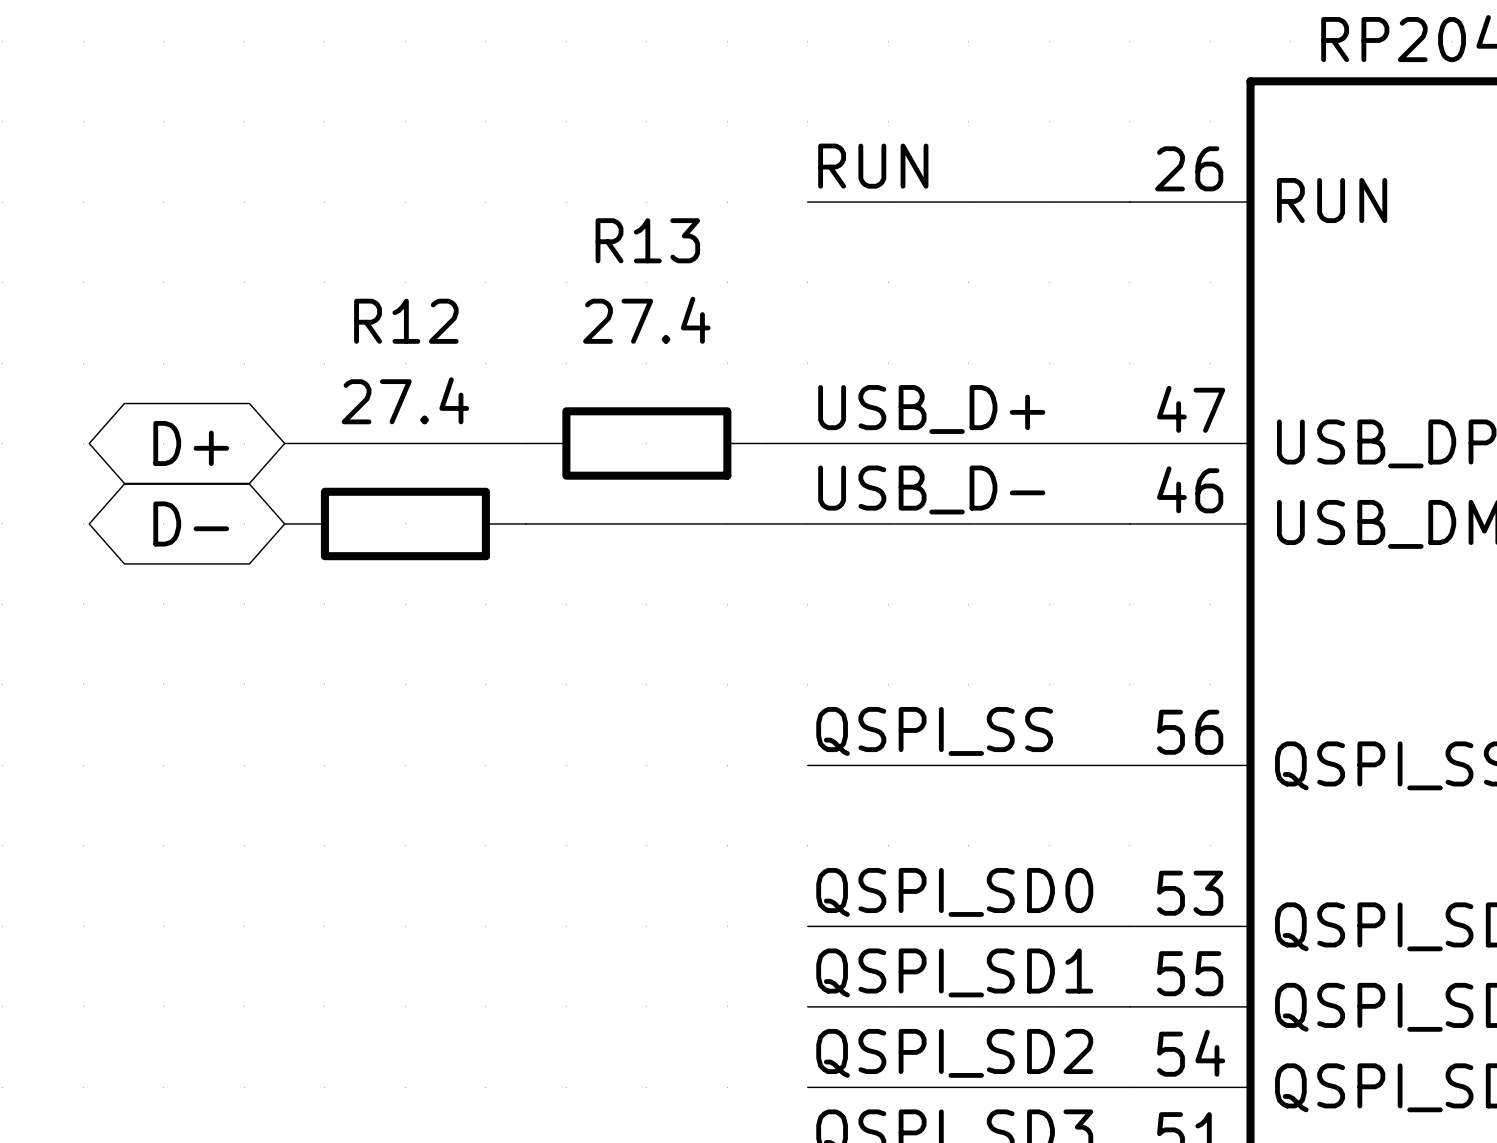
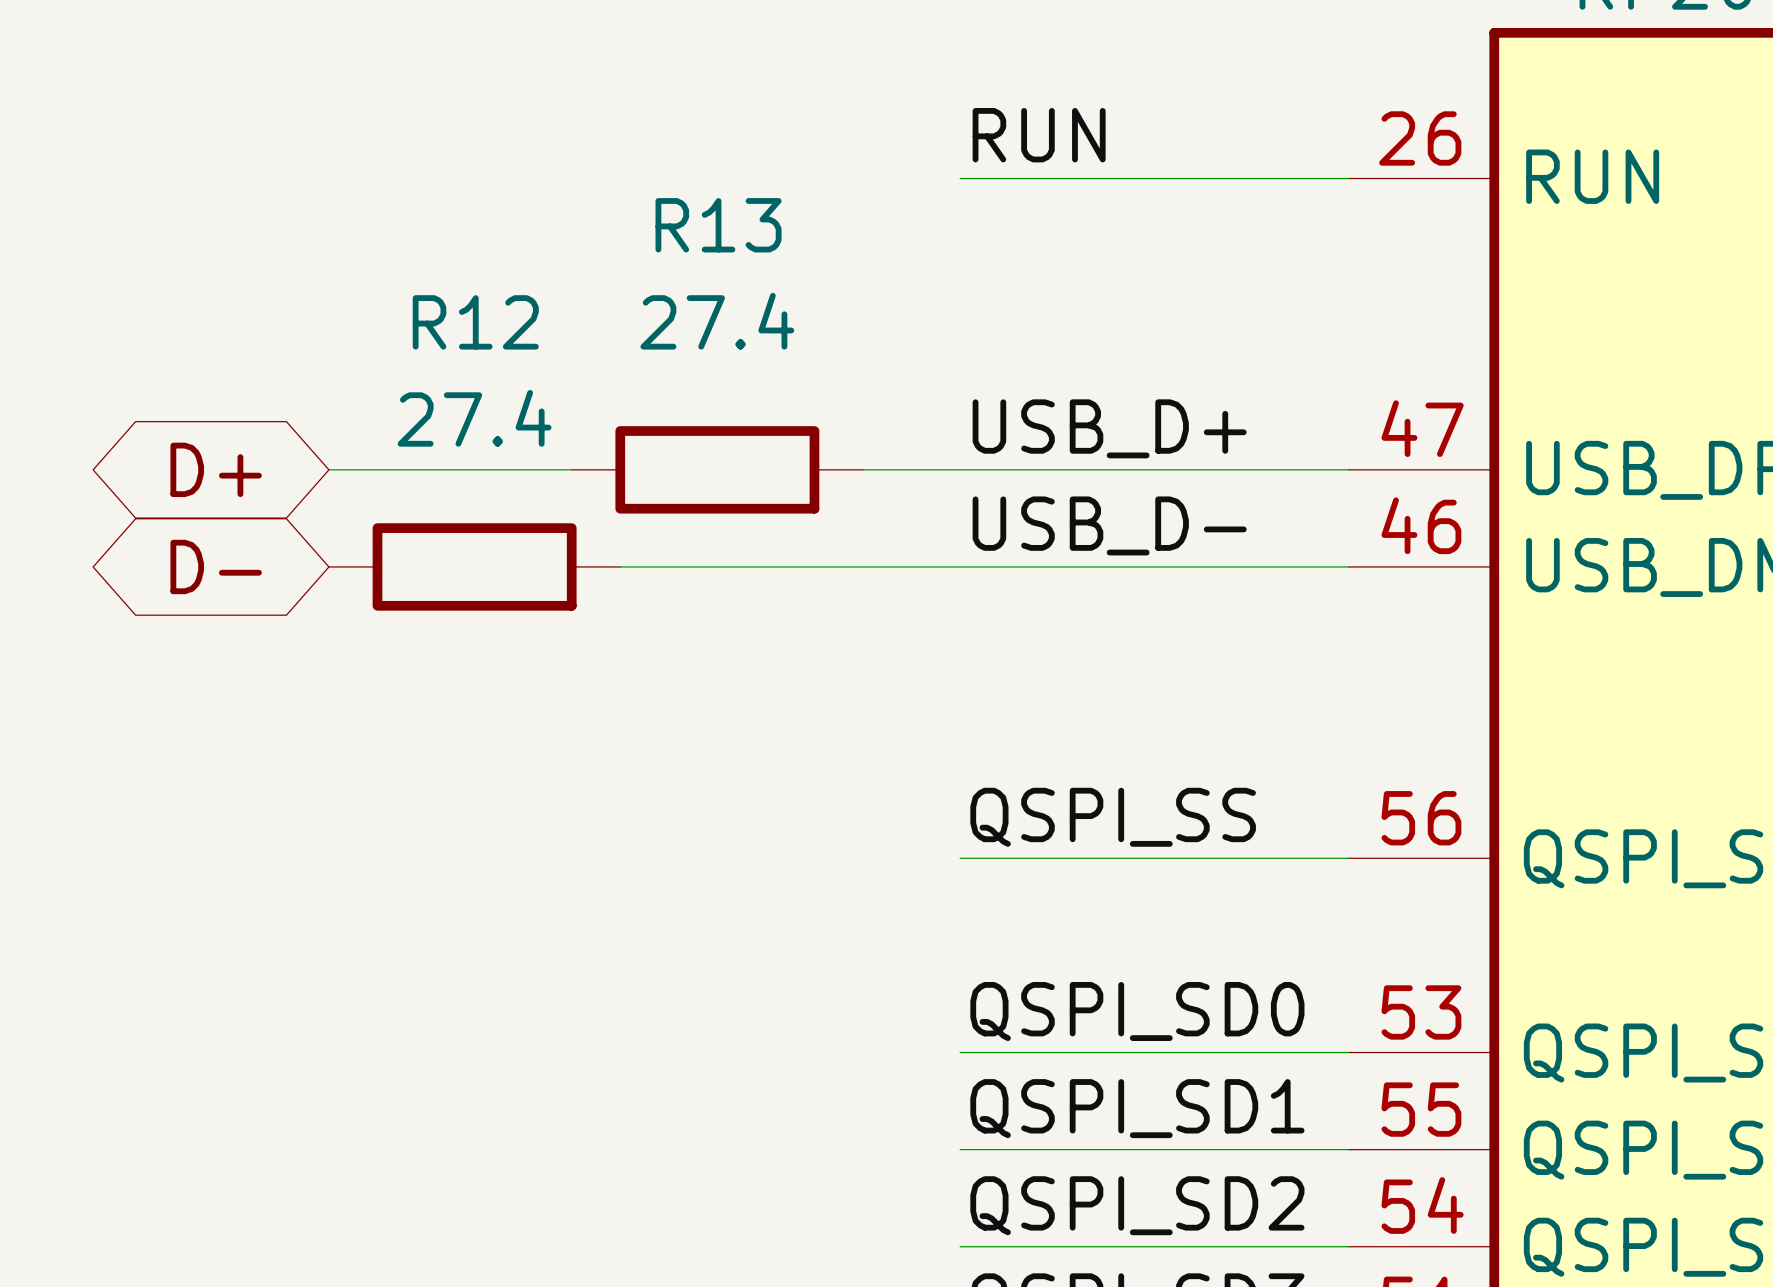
R13 position: (646, 443) -> (717, 469)

